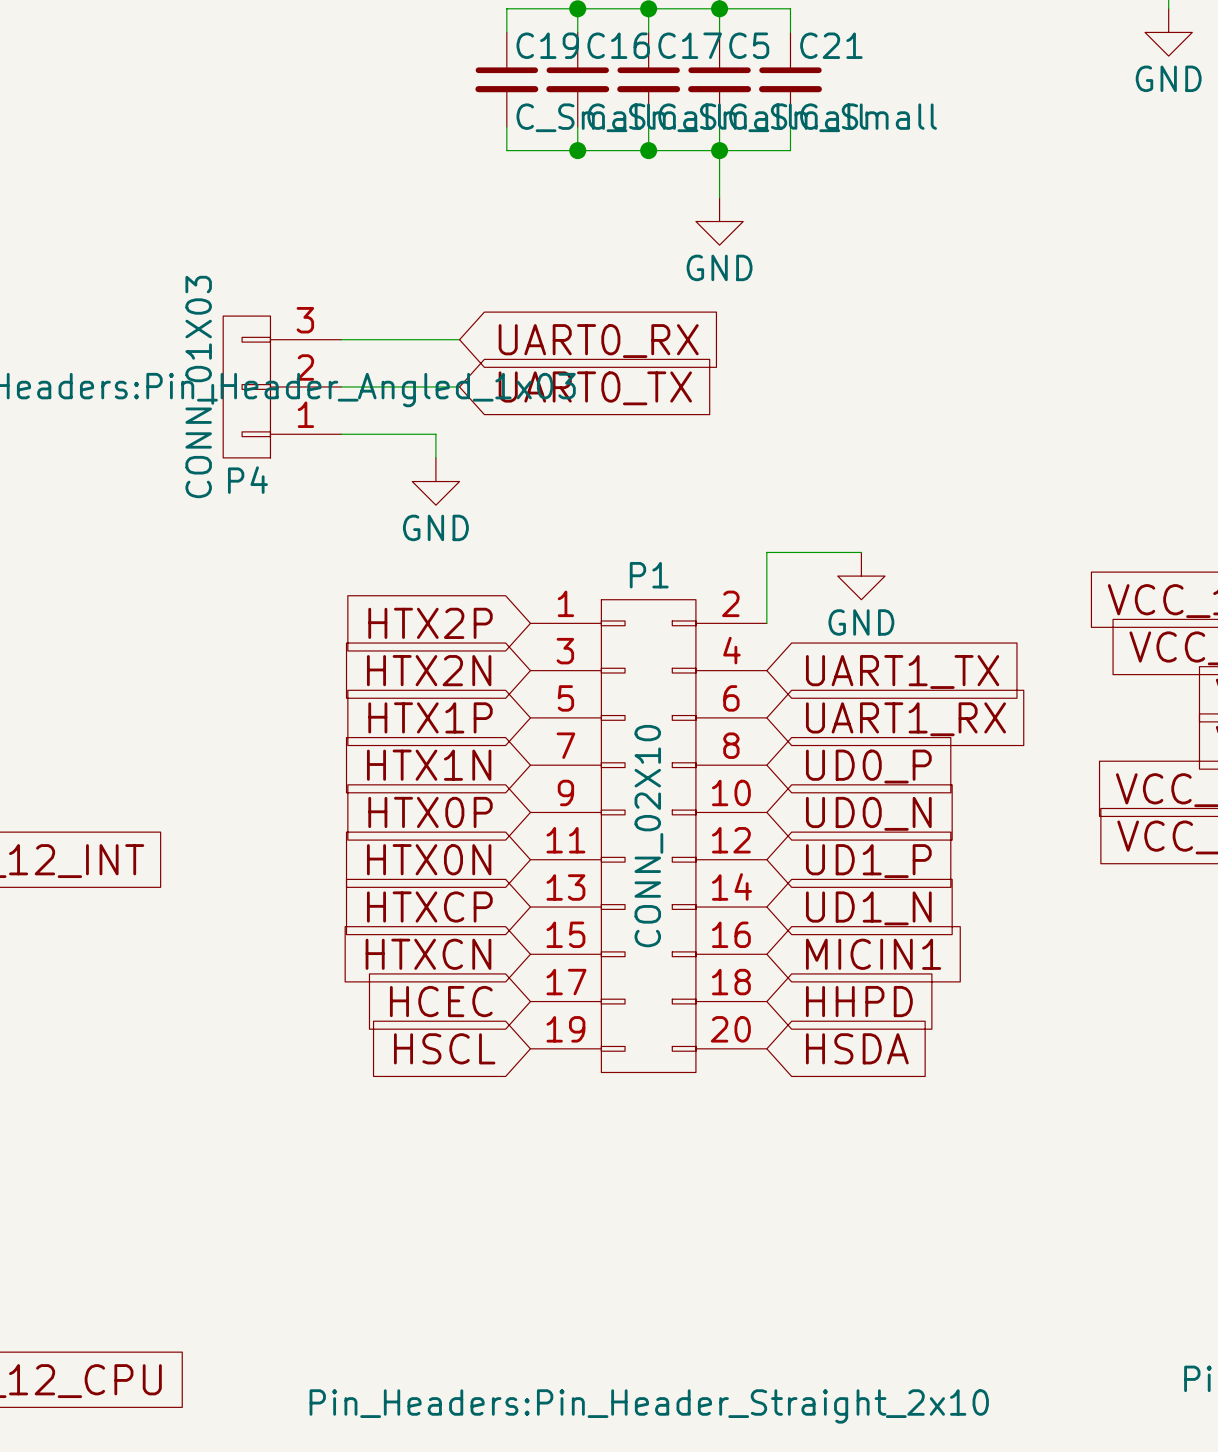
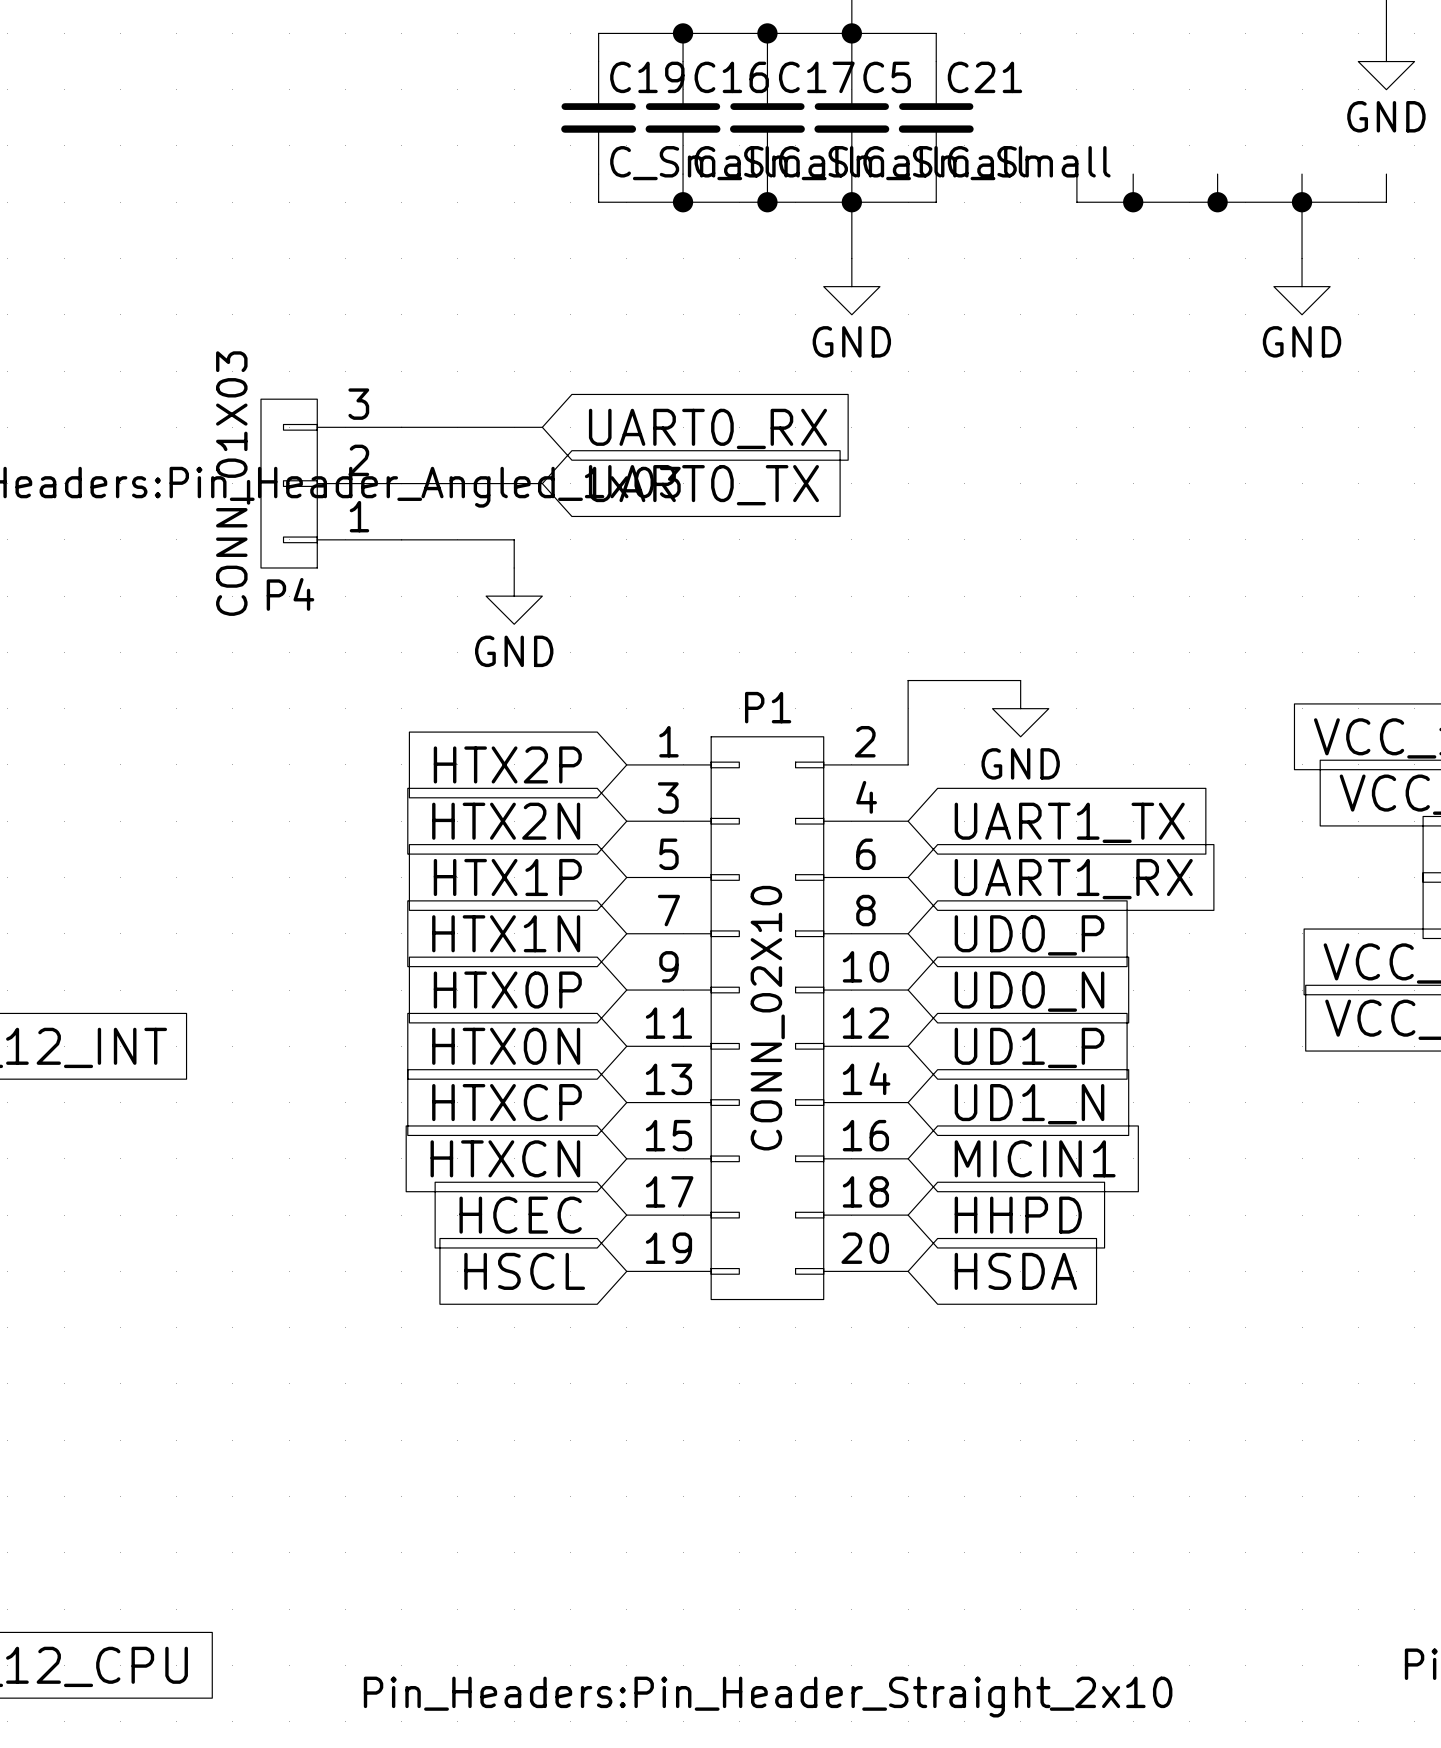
wire: none -> (1076, 174) (1076, 202) (1386, 202) (1386, 174)
wire: none -> (1133, 174) (1133, 202)
wire: none -> (1217, 174) (1217, 202)
wire: none -> (1302, 174) (1302, 258)
junction: none -> (1133, 202)
junction: none -> (1217, 202)
junction: none -> (1302, 202)
power symbol: none -> GND (1302, 286)

